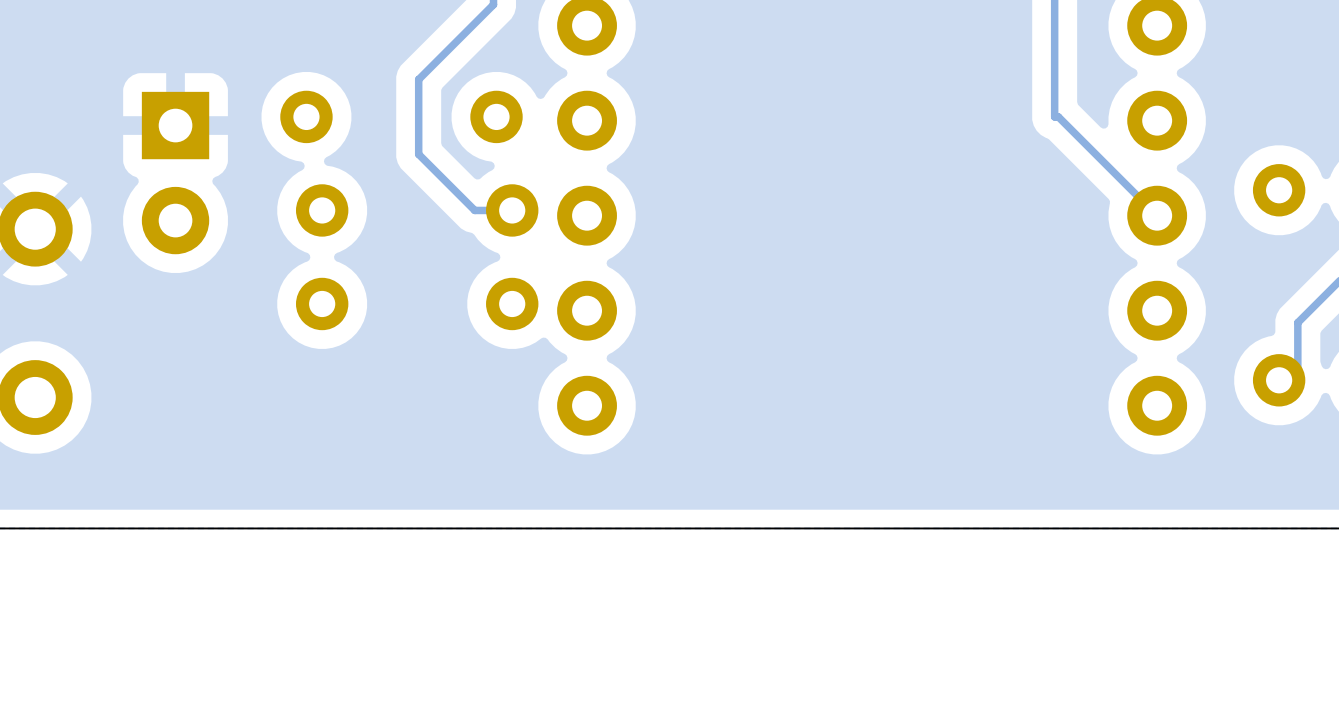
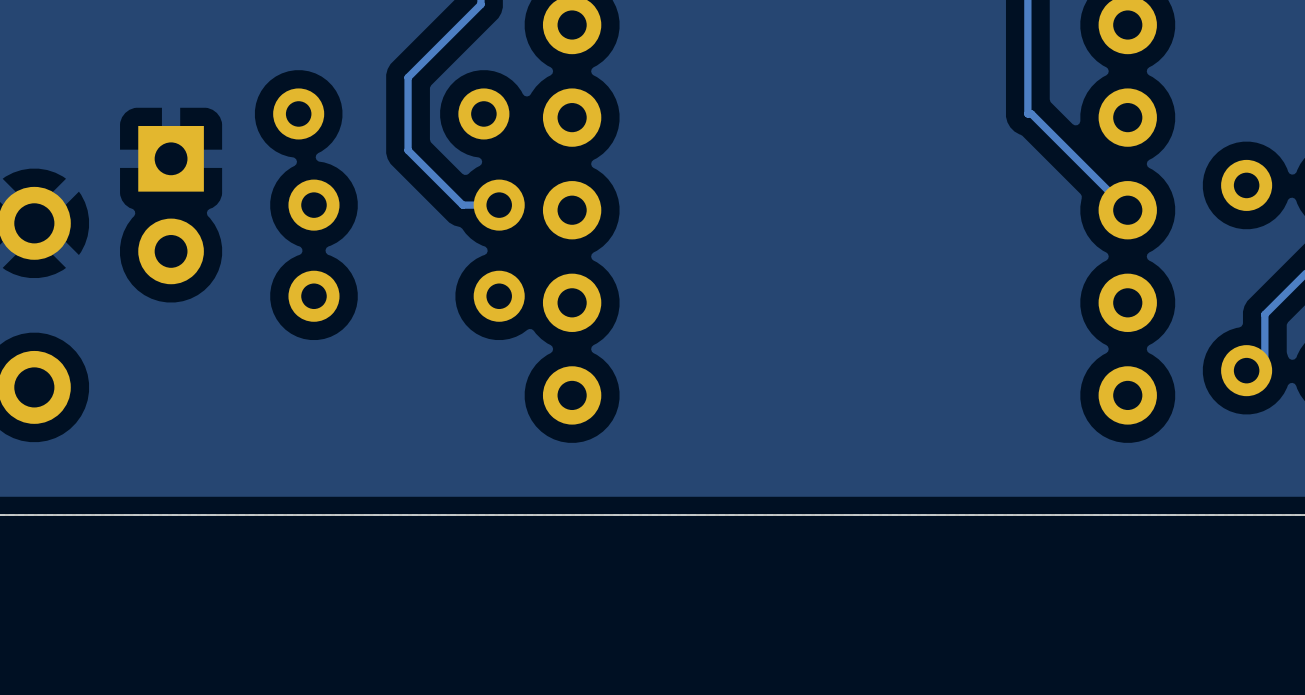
part position: (175, 173) -> (171, 205)

